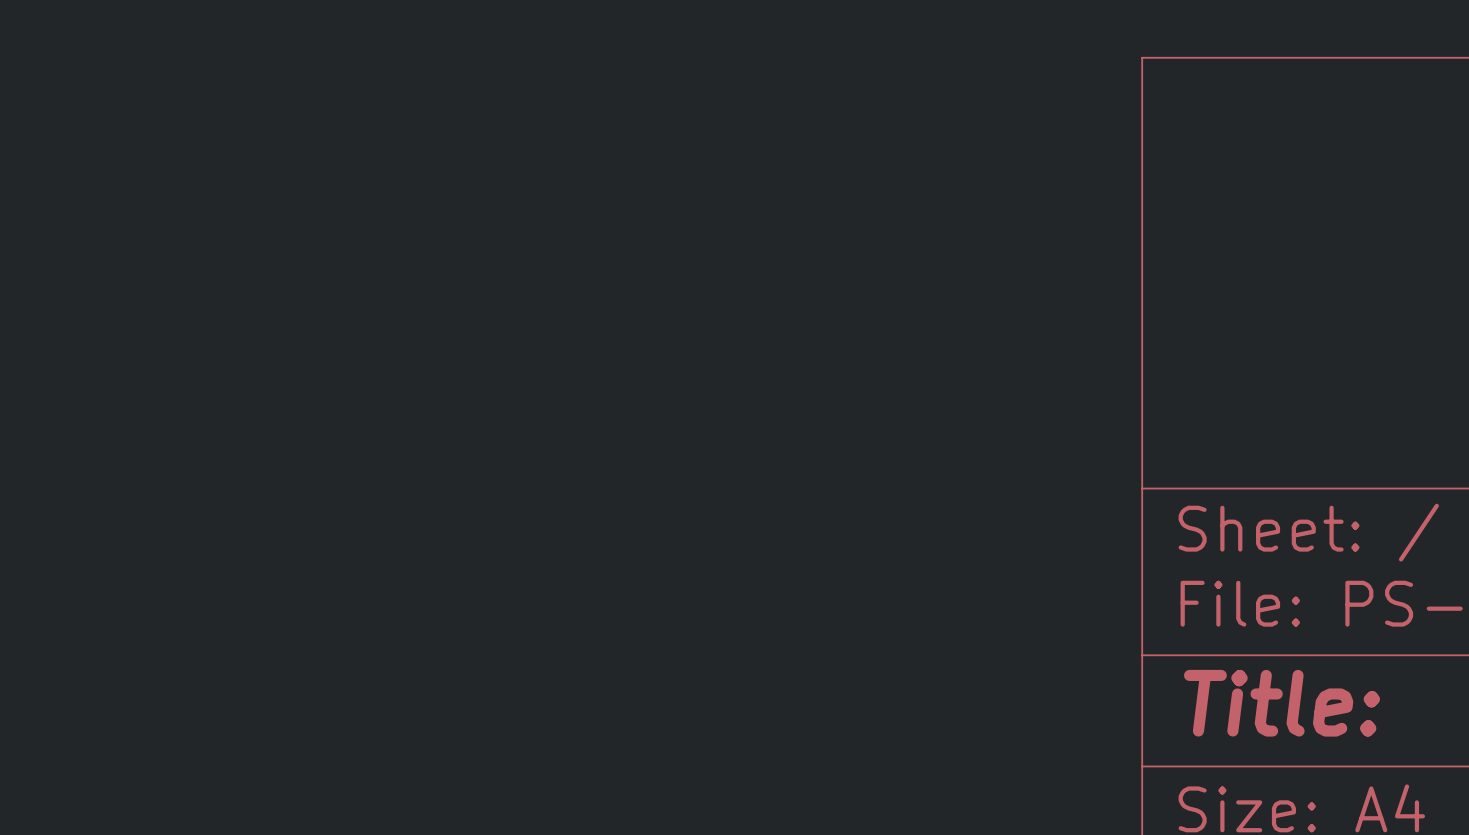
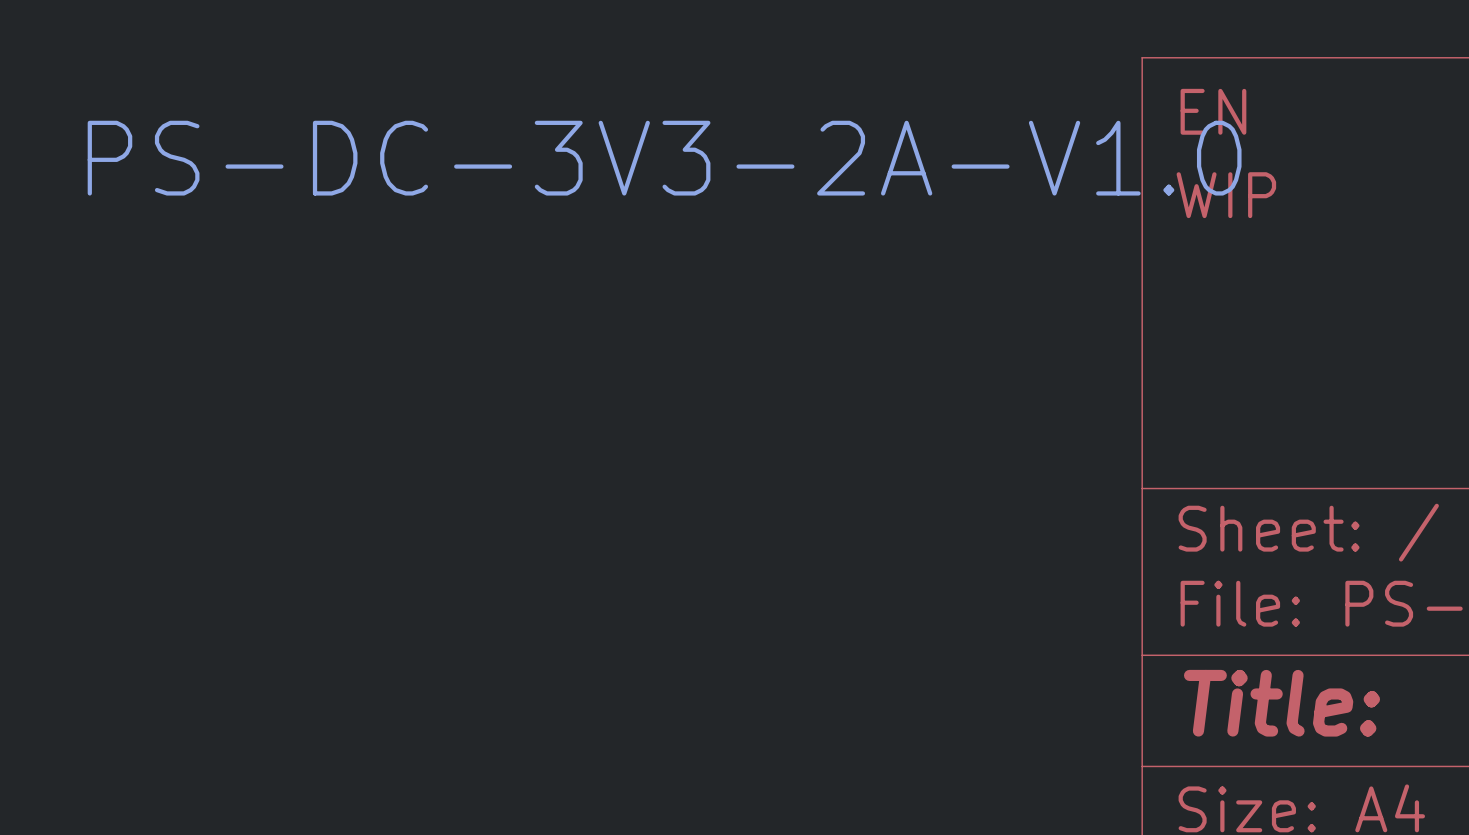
title block: none -> EN (1213, 111)
text: none -> PS-DC-3V3-2A-V1.0 (664, 158)
title block: none -> WIP (1226, 195)

